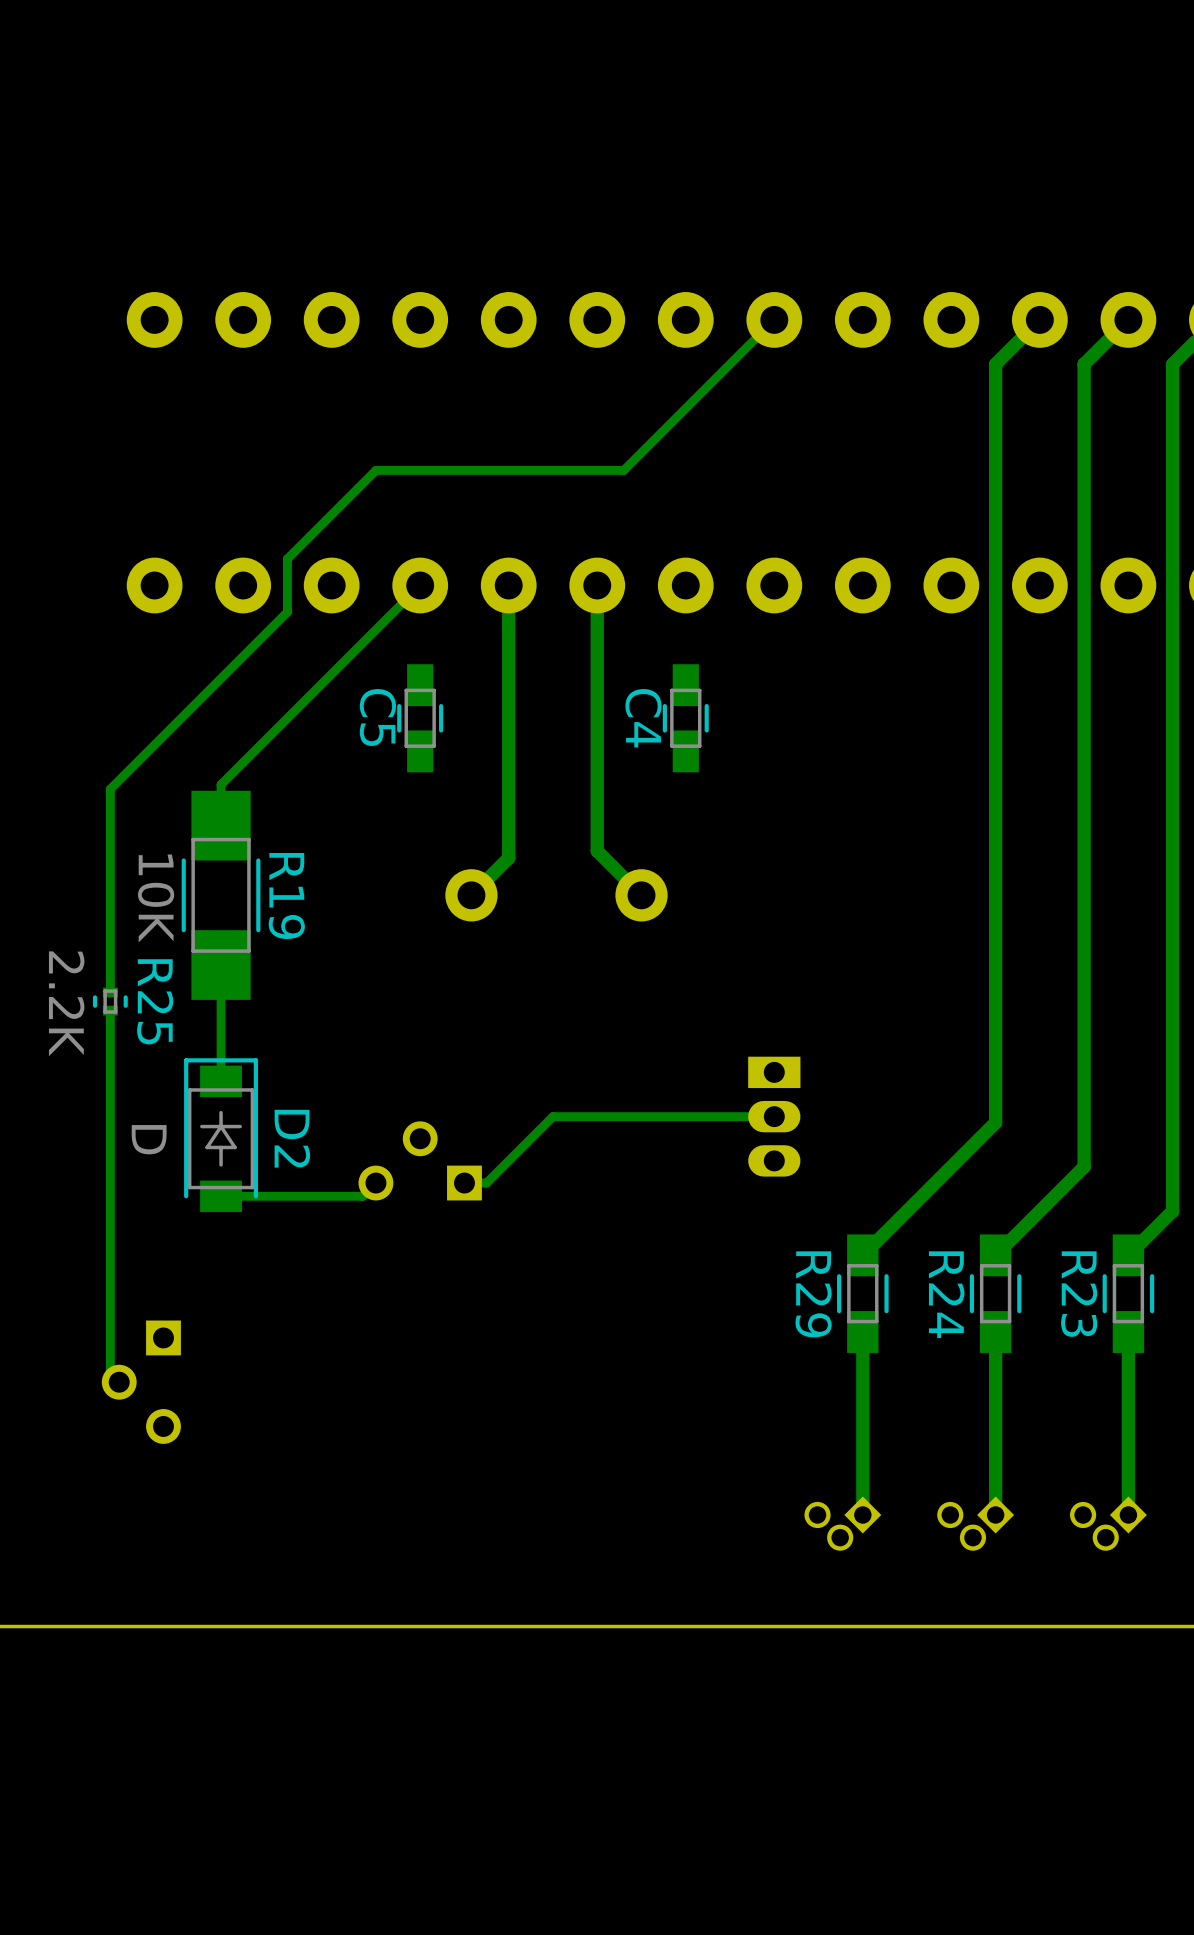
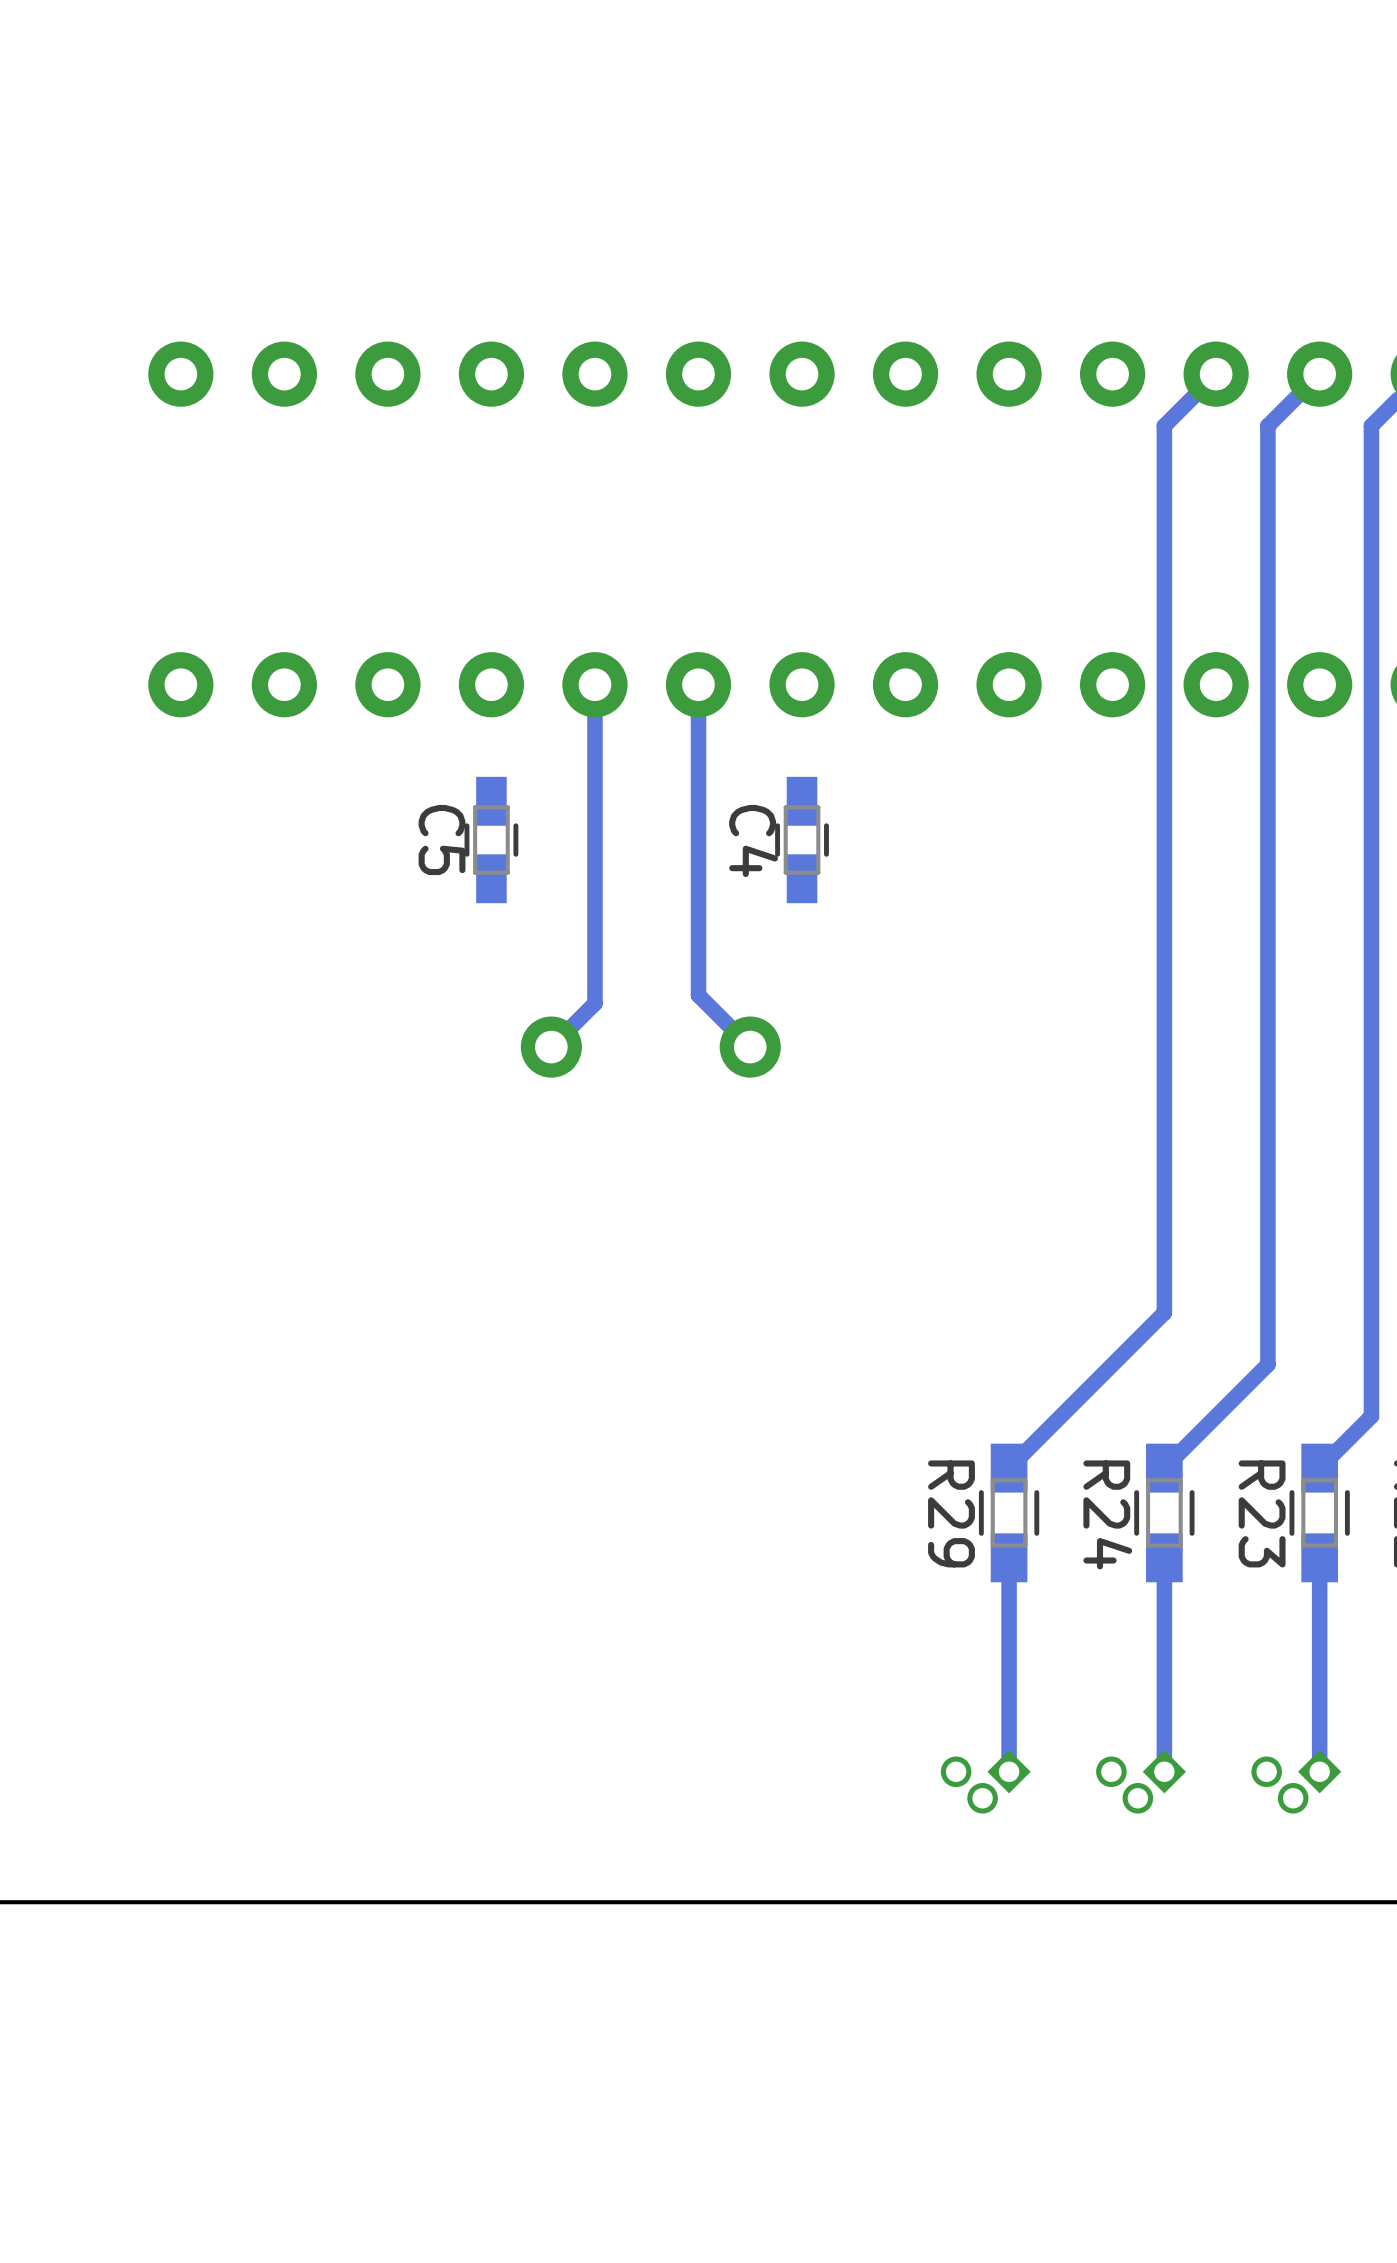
track: (774, 319) (623, 470) (375, 470) (287, 558) (287, 612) (110, 789) (110, 992) -> none
track: (420, 585) (221, 784) (221, 825) -> none
R19: 10K (221, 895) -> none
track: (221, 965) (221, 1081) -> none
R25: 2.2K (110, 1001) -> none
track: (110, 1010) (110, 1373) (119, 1382) -> none
track: (774, 1116) (553, 1116) (486, 1183) (464, 1183) -> none
part: (774, 1116) -> none
D2: D (221, 1135) -> none
part: (420, 1160) -> none
track: (375, 1183) (362, 1196) (221, 1196) -> none
part: (141, 1382) -> none

